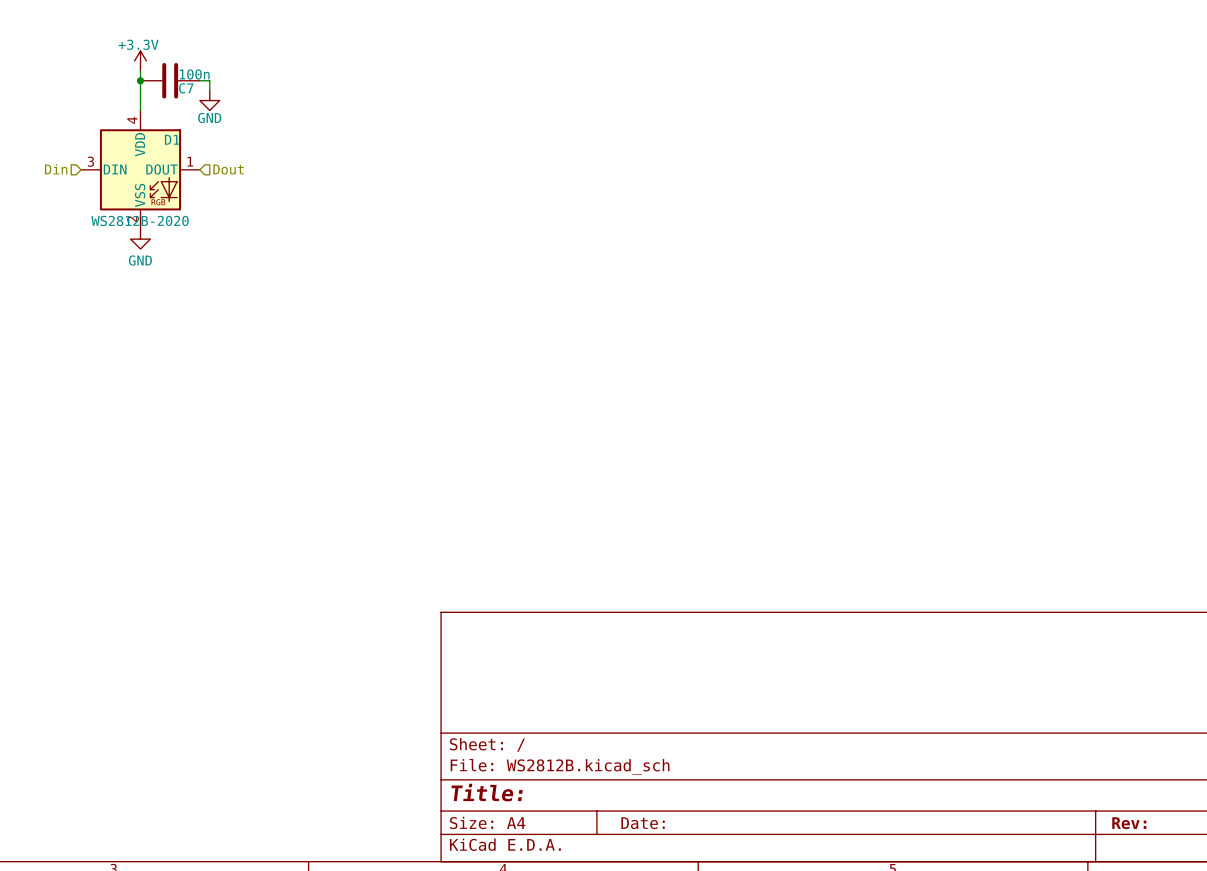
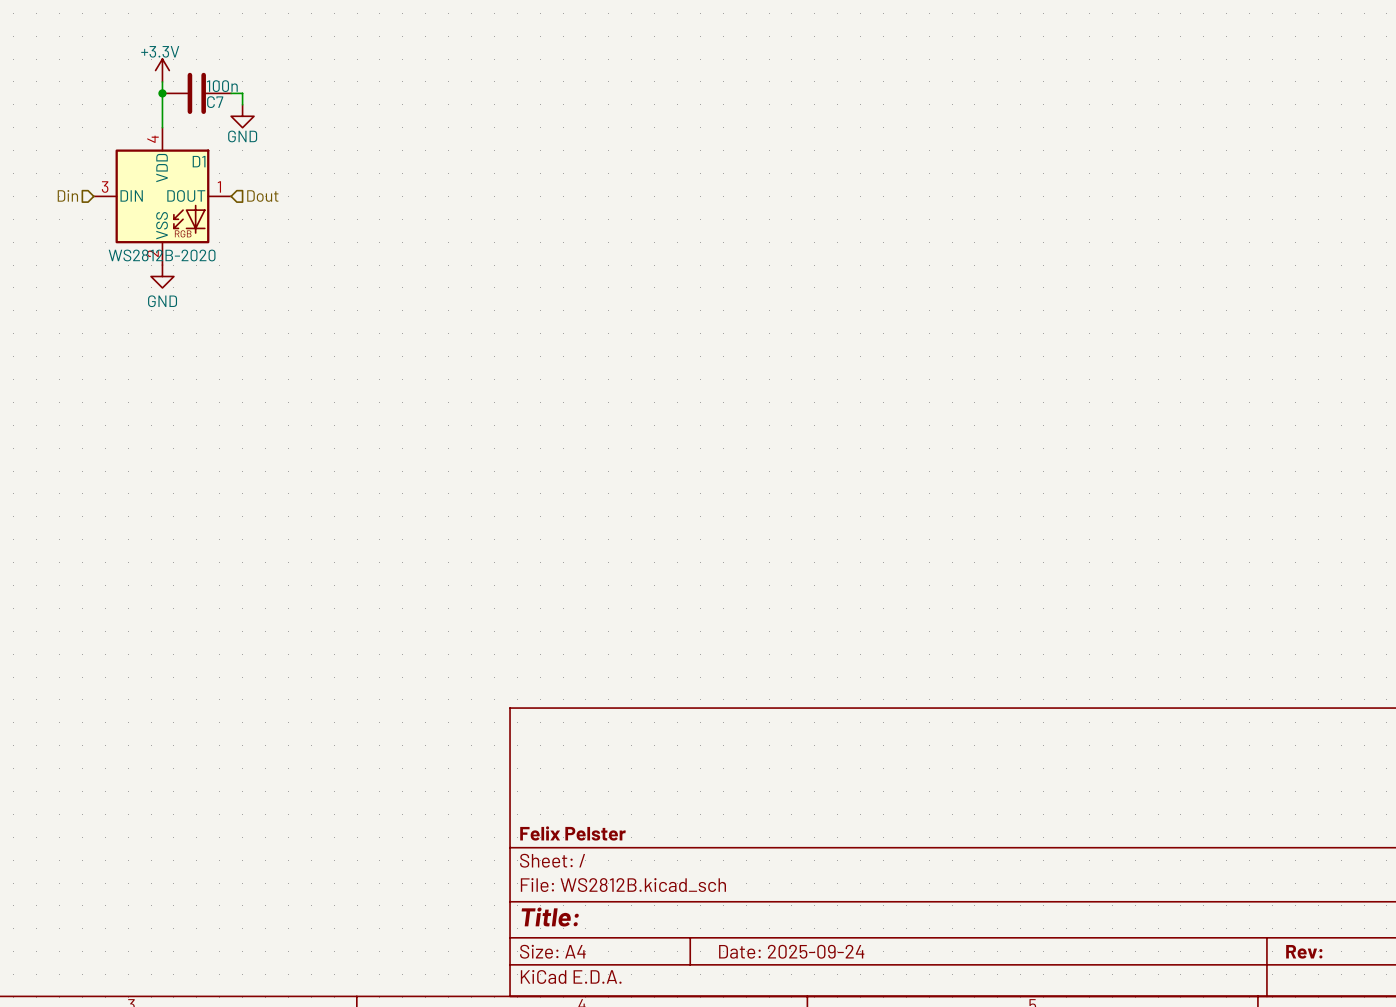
title block: none -> Felix Pelster (573, 833)
title block: Date: (643, 823) -> Date: 2025-09-24 (791, 951)

